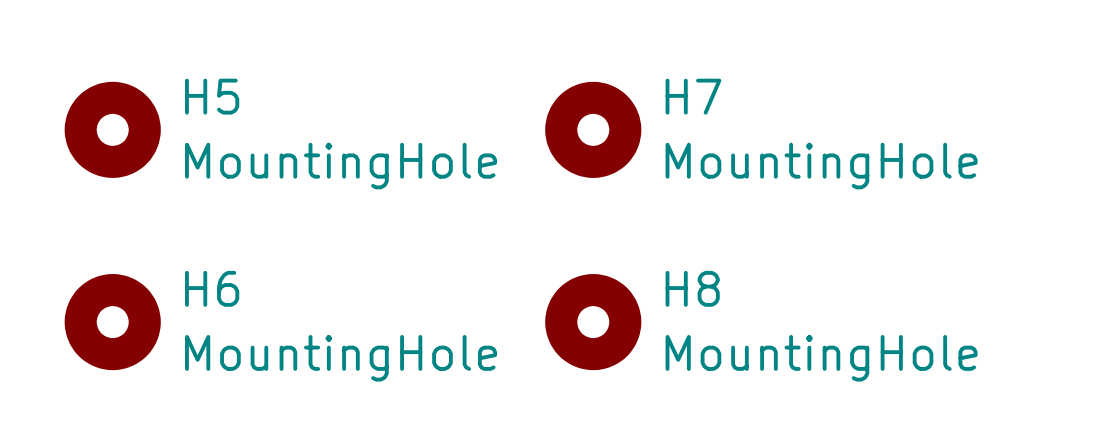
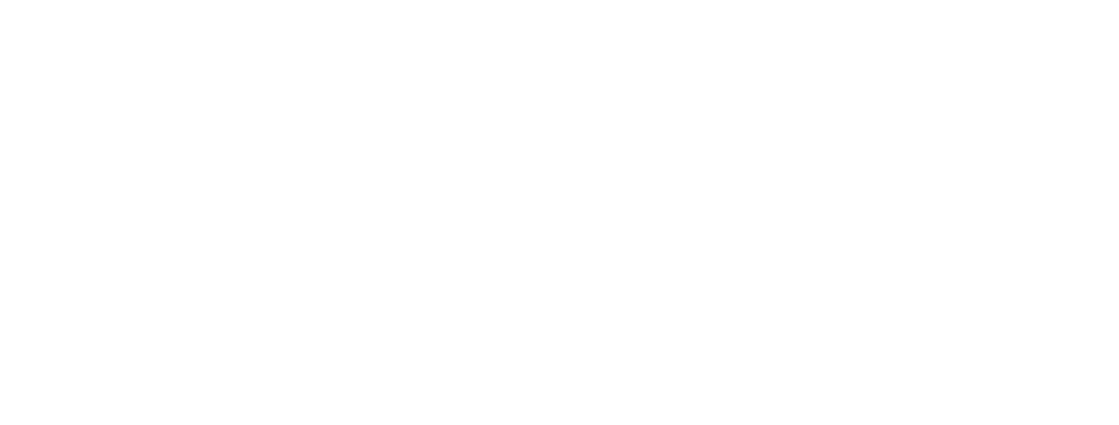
H5: MountingHole (112, 129) -> none
H7: MountingHole (593, 129) -> none
H6: MountingHole (112, 322) -> none
H8: MountingHole (593, 322) -> none

